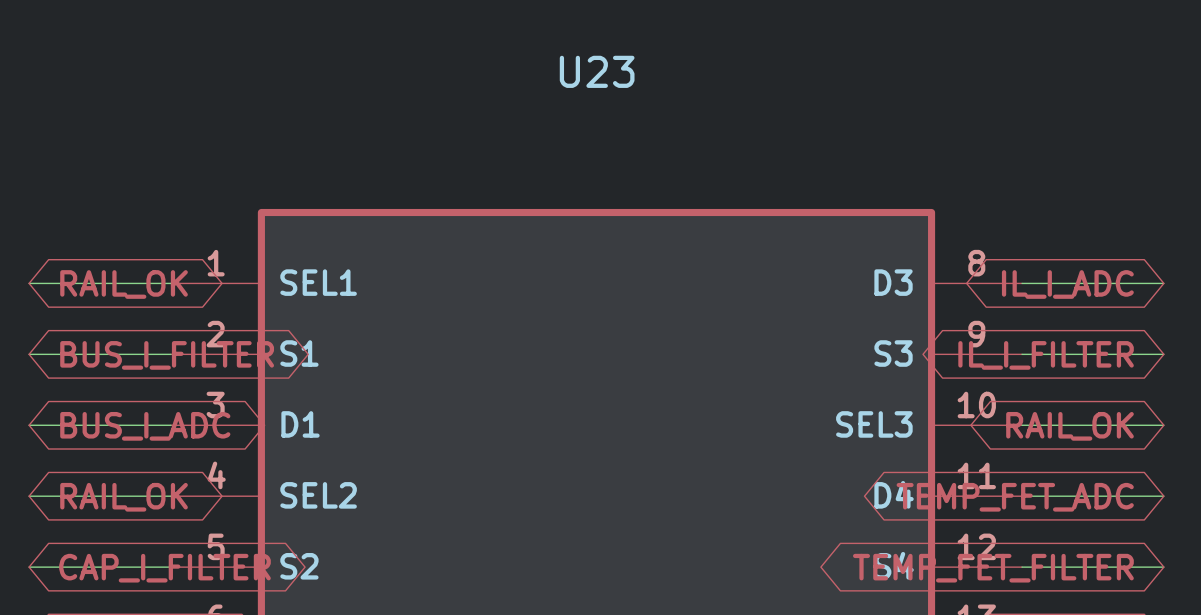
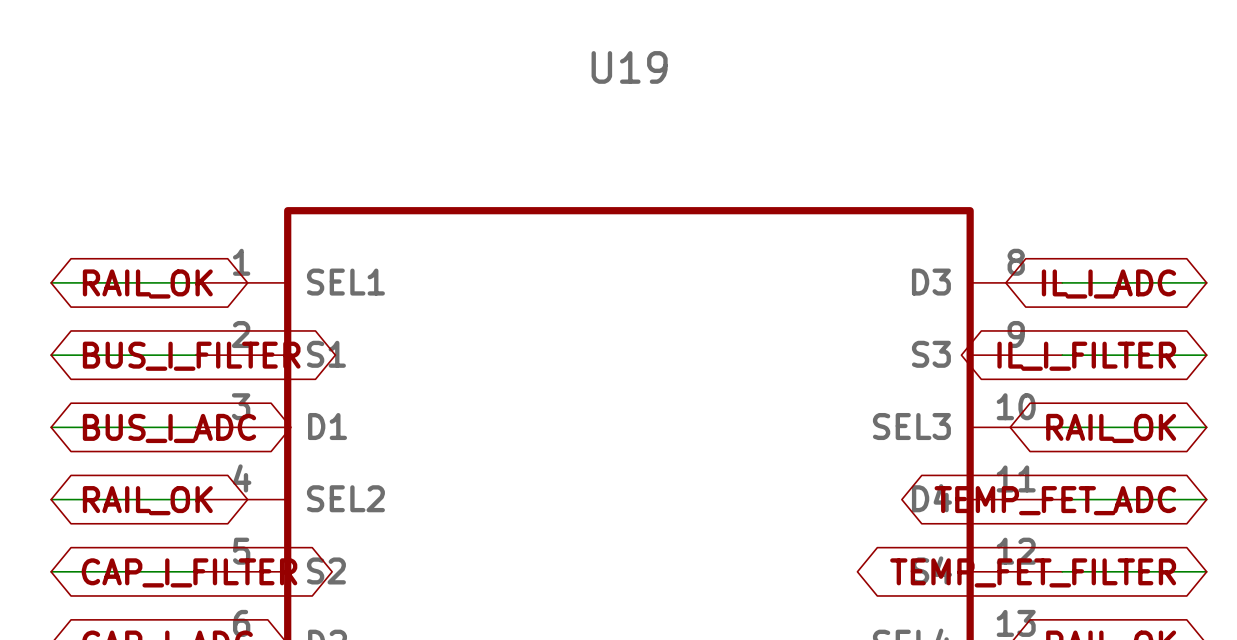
U23 name: U23 (597, 71) -> U19 (629, 67)

